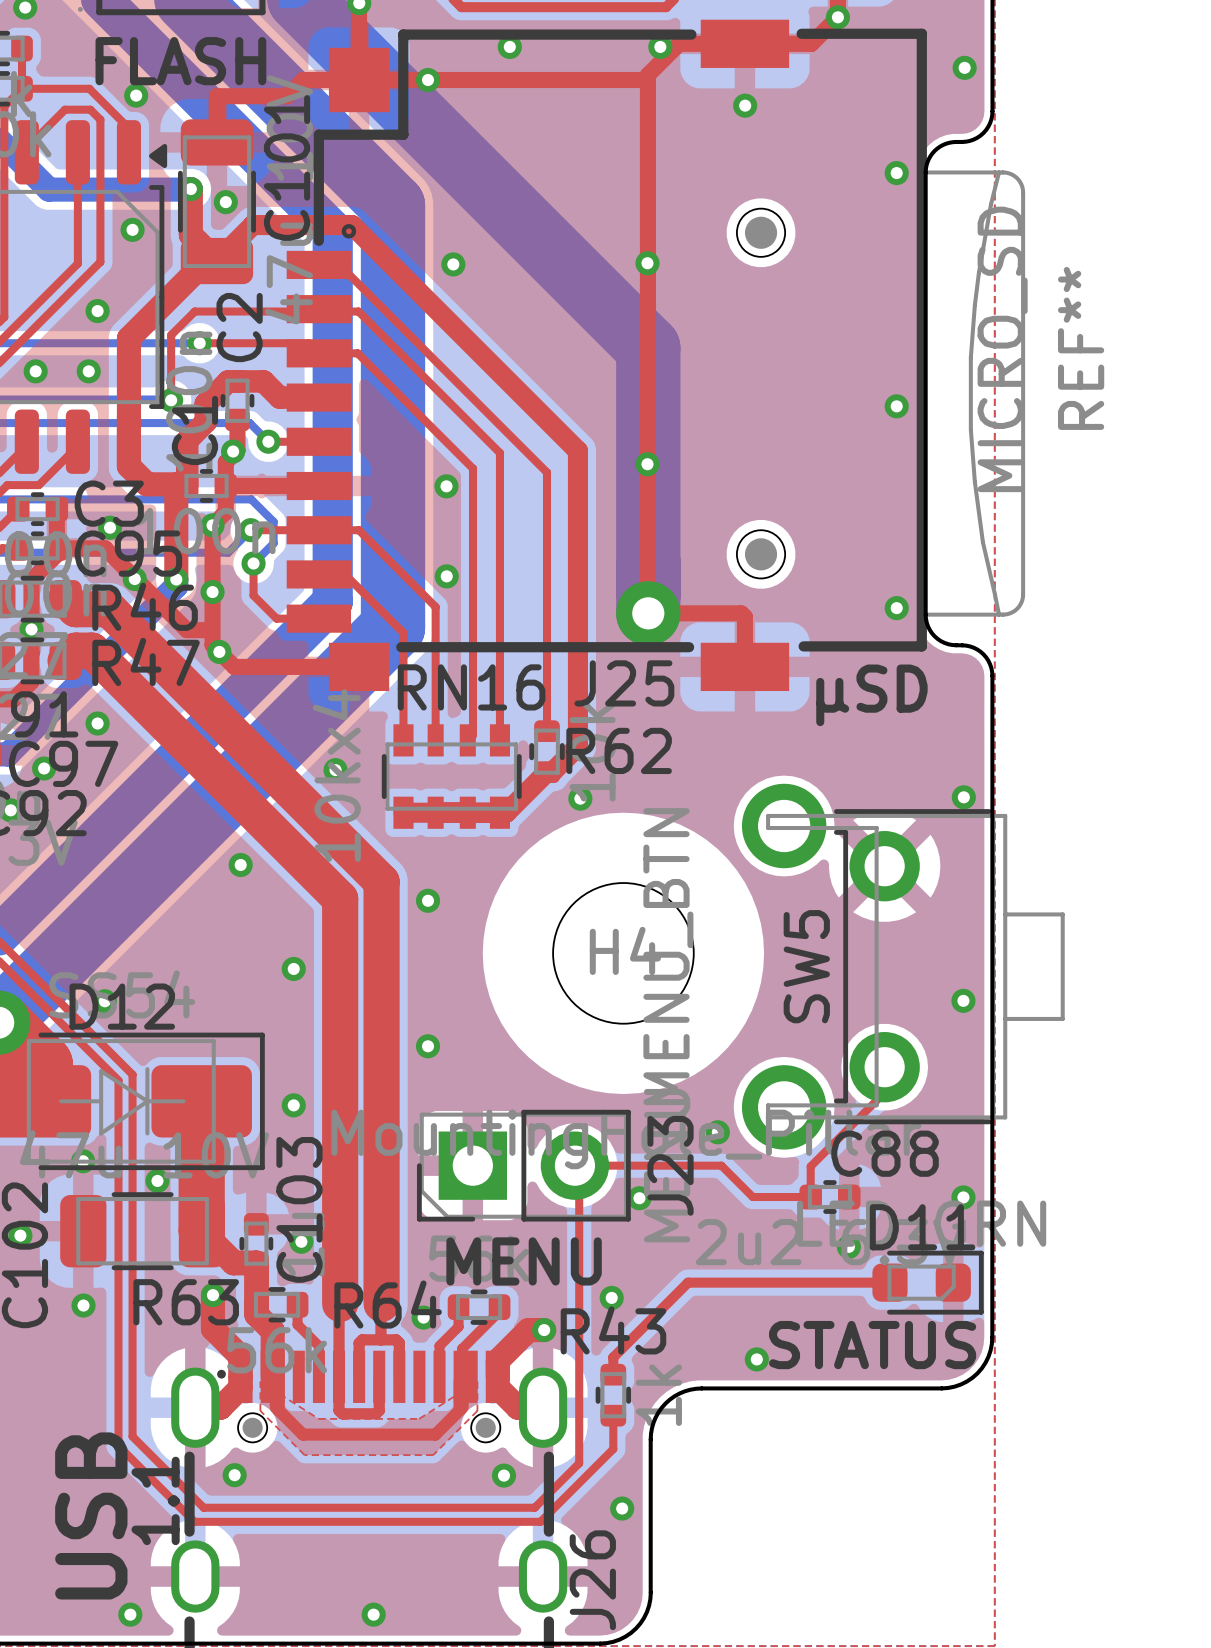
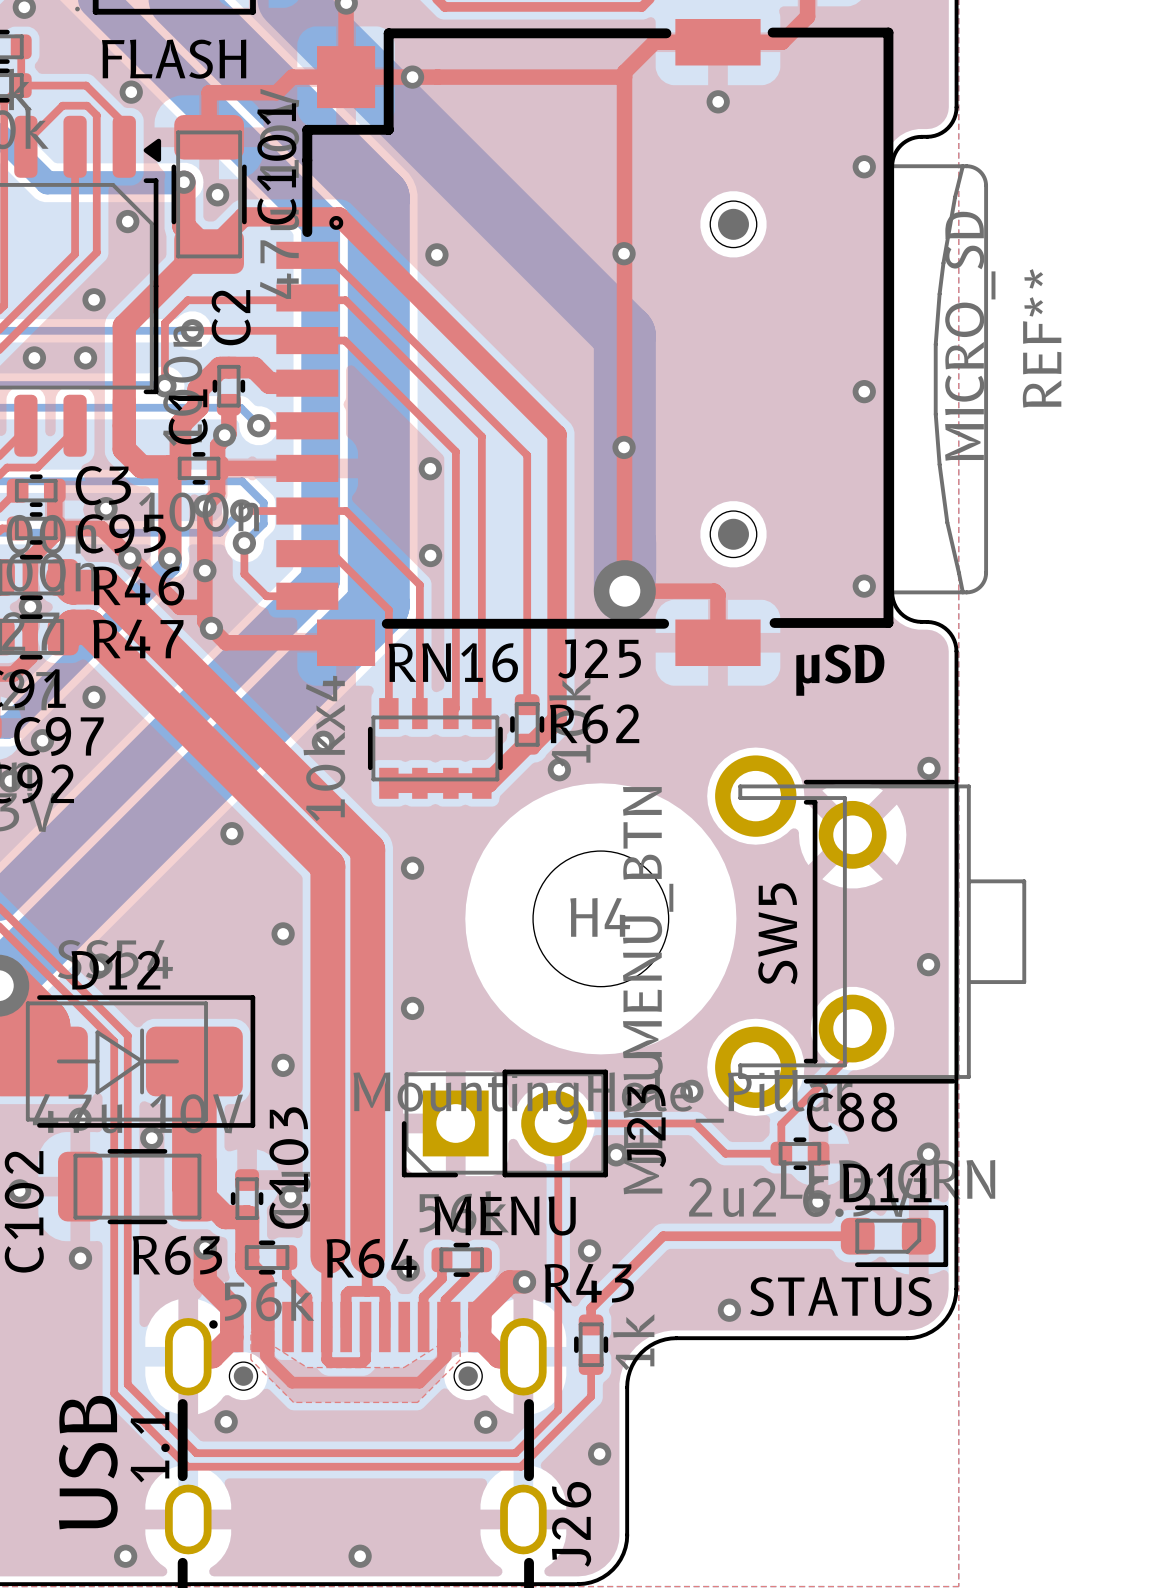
via: (837, 17) -> none
via: (509, 46) -> none
via: (660, 46) -> none
via: (964, 67) -> none

